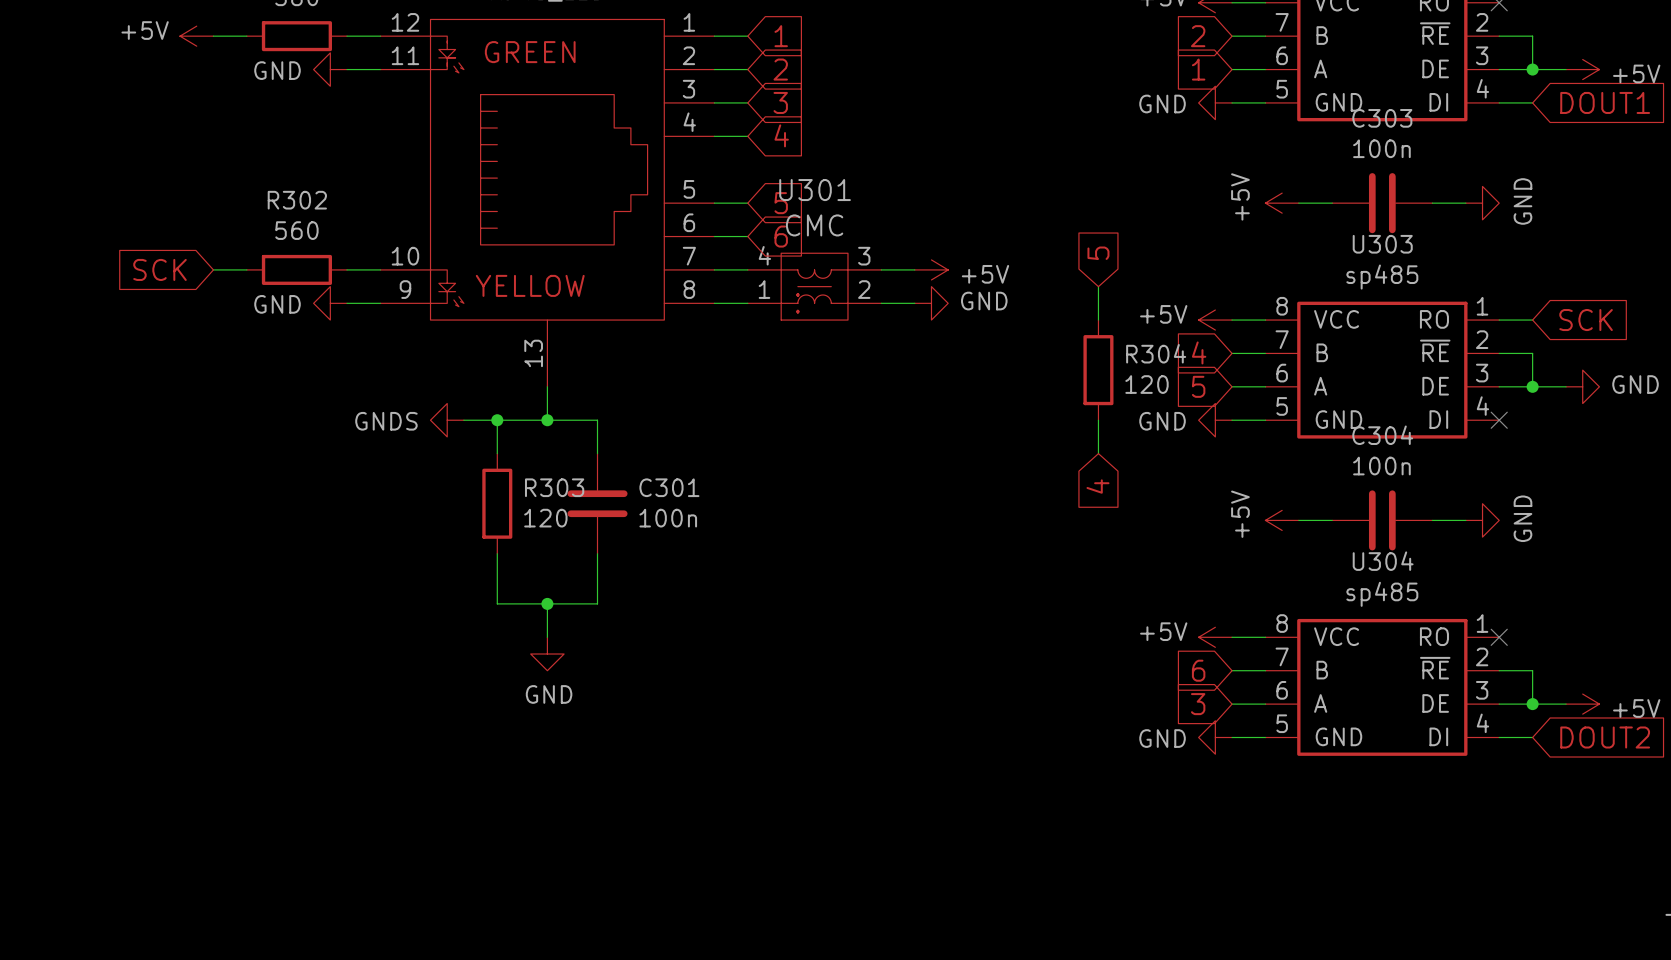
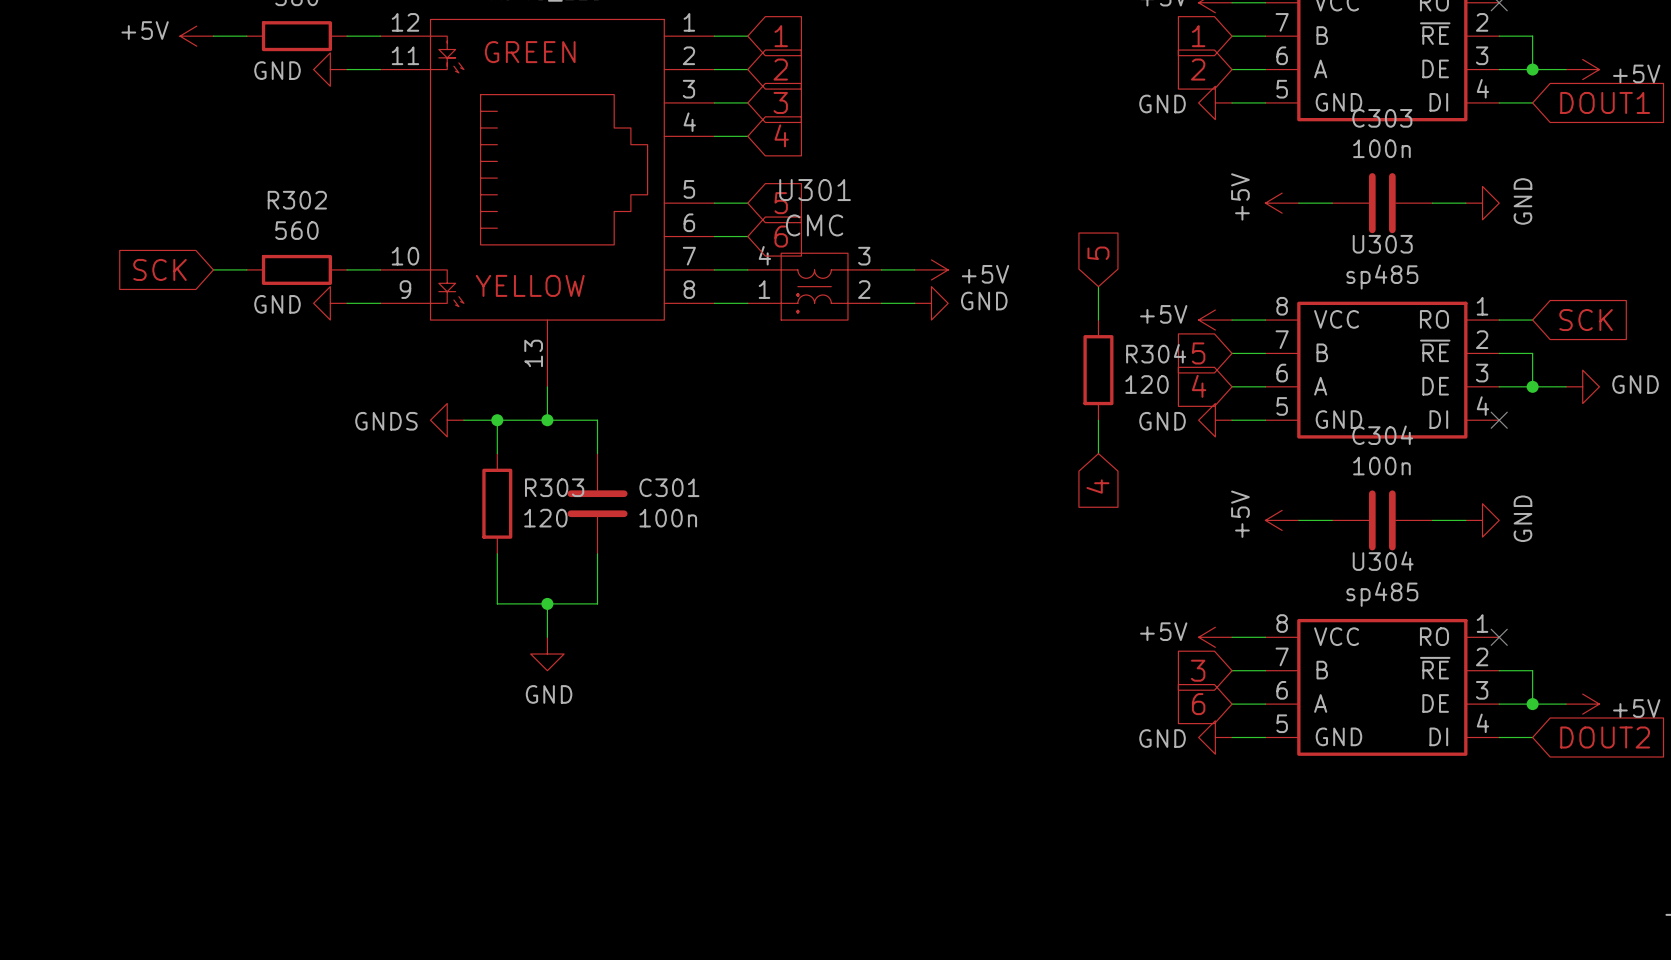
global label: 2 (1198, 36) -> 1 (1198, 36)
global label: 1 (1198, 69) -> 2 (1198, 69)
global label: 4 (1199, 352) -> 5 (1198, 353)
global label: 5 (1198, 386) -> 4 (1199, 386)
global label: 6 (1198, 670) -> 3 (1198, 670)
global label: 3 (1198, 704) -> 6 (1198, 704)

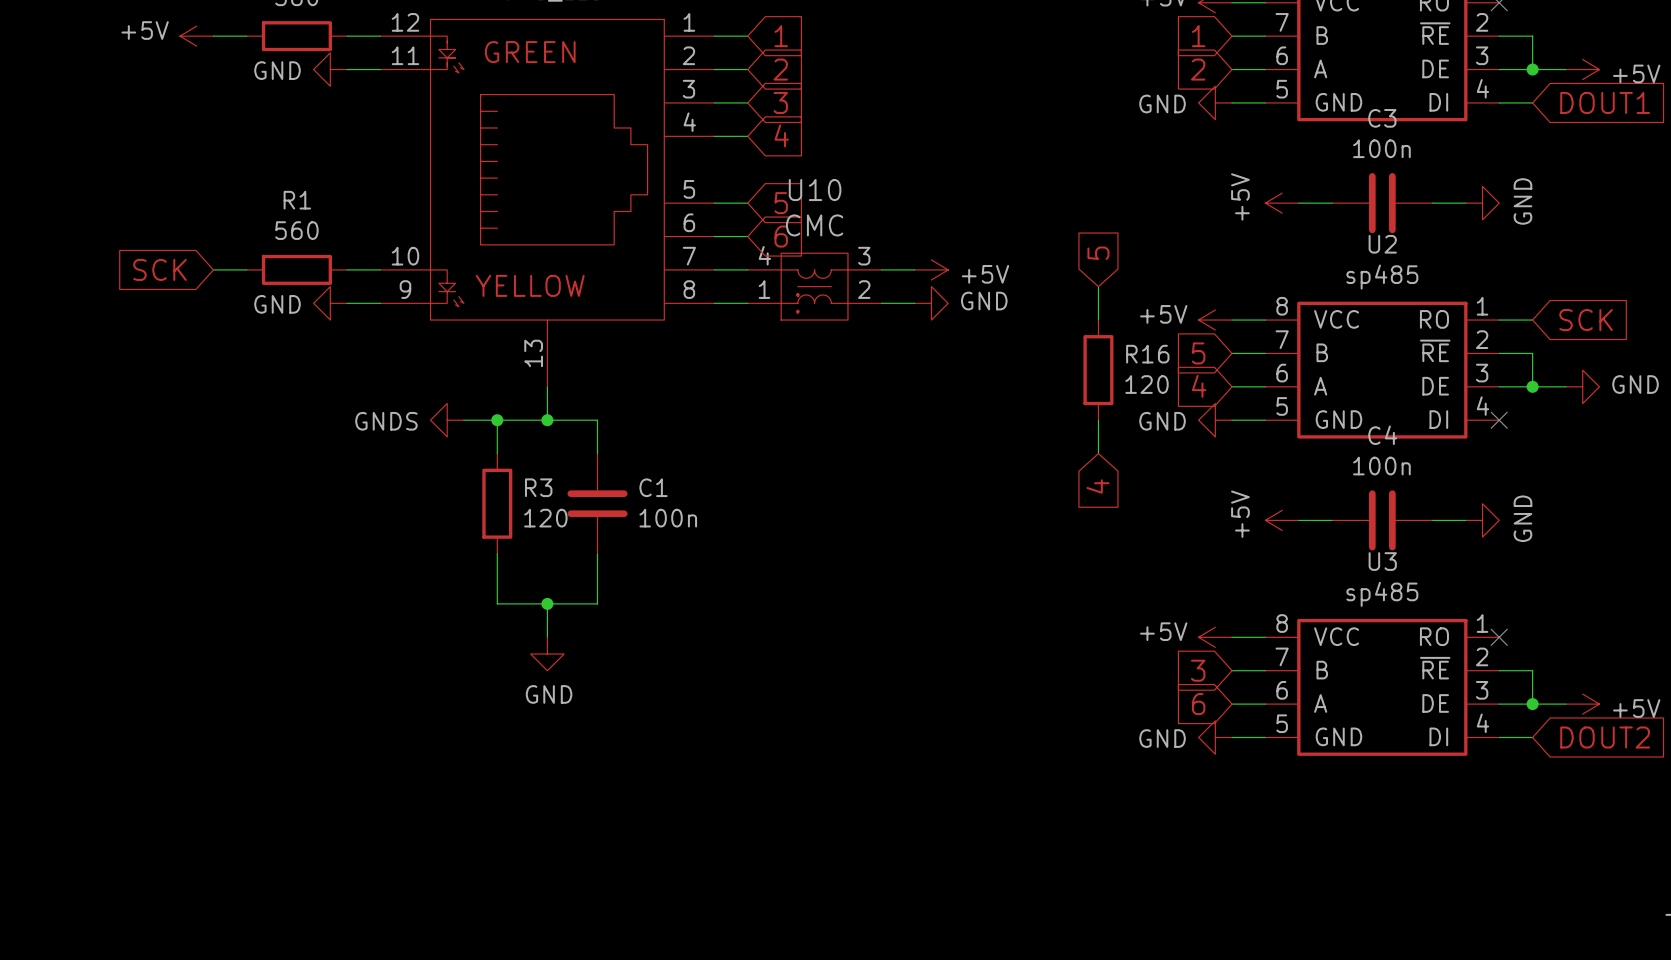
C303 name: C303 (1382, 118) -> C3 (1382, 118)
U301 name: U301 (815, 190) -> U10 (815, 190)
R302 name: R302 (297, 200) -> R1 (297, 200)
U303 name: U303 (1382, 244) -> U2 (1382, 244)
R304 name: R304 (1156, 353) -> R16 (1147, 354)
C304 name: C304 (1382, 435) -> C4 (1382, 435)
R303 name: R303 (554, 487) -> R3 (538, 487)
C301 name: C301 (669, 487) -> C1 (653, 487)
U304 name: U304 (1383, 561) -> U3 (1382, 561)

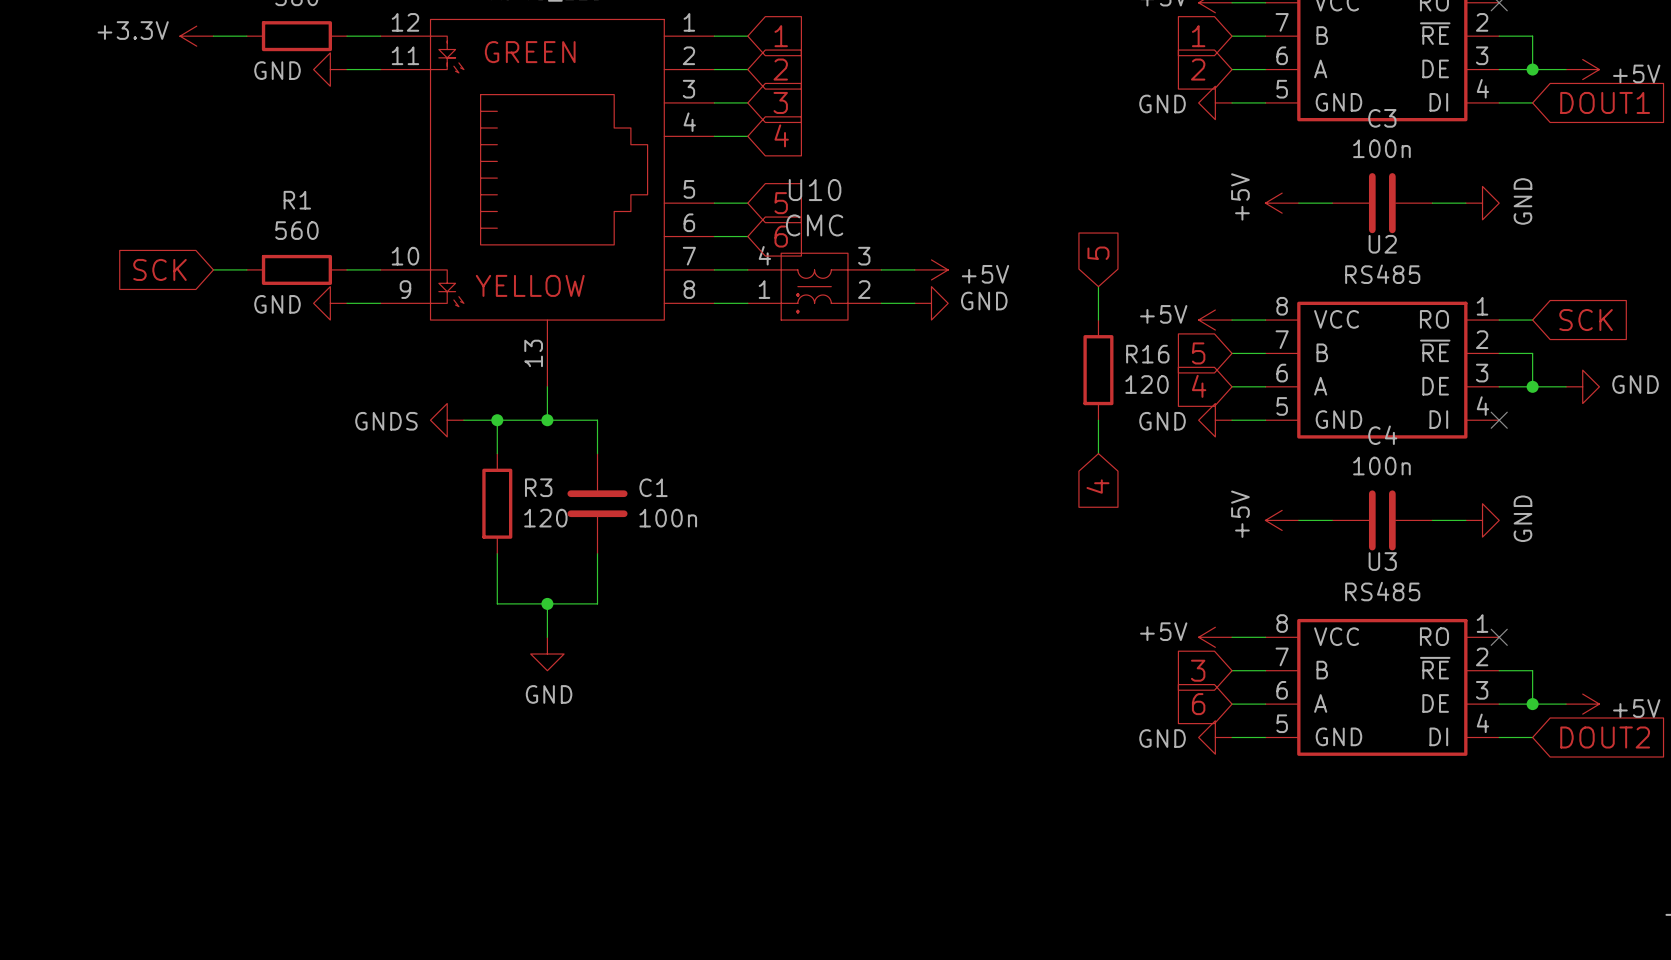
power symbol: +5V (196, 36) -> +3.3V (196, 36)
U2 value: sp485 (1382, 277) -> RS485 (1382, 274)
U3 value: sp485 (1382, 594) -> RS485 (1382, 591)

